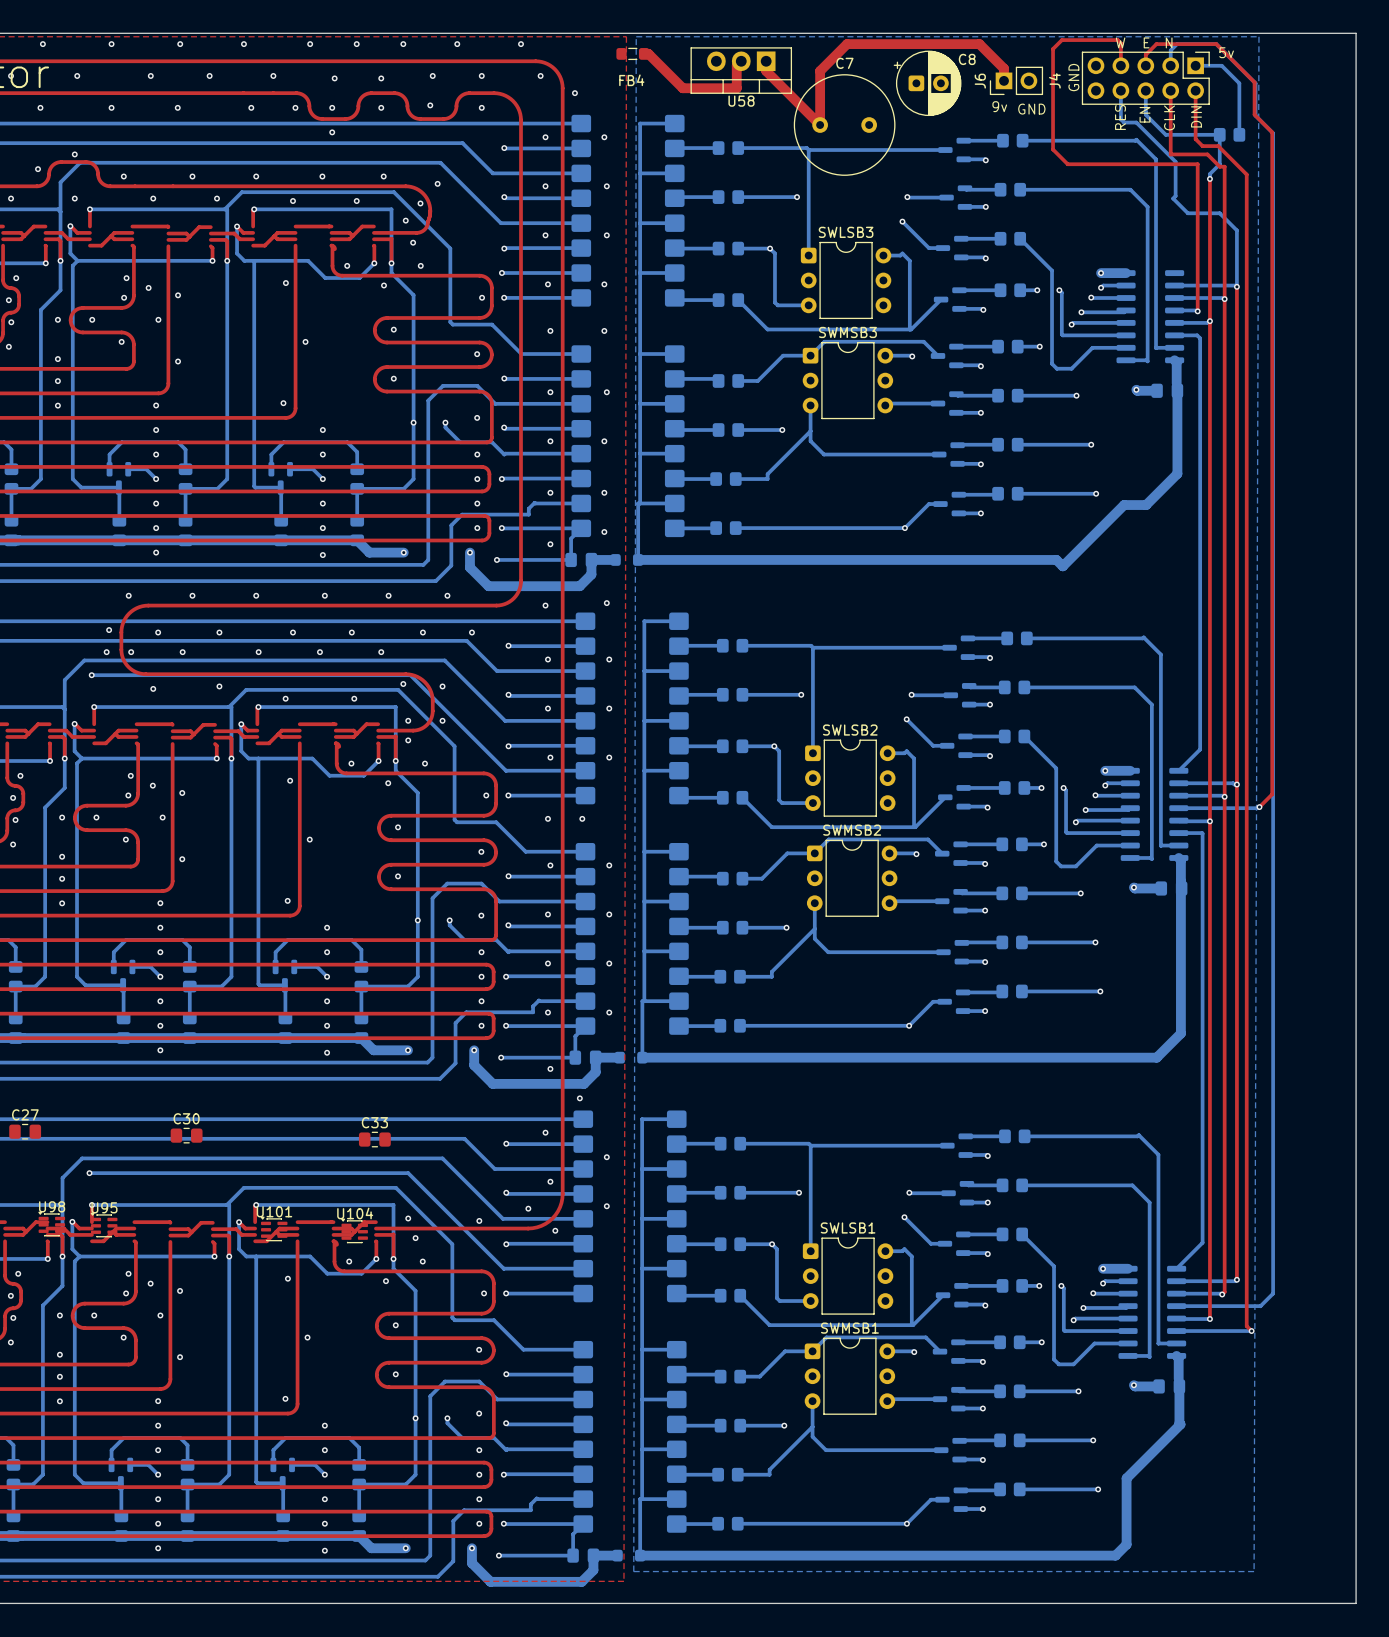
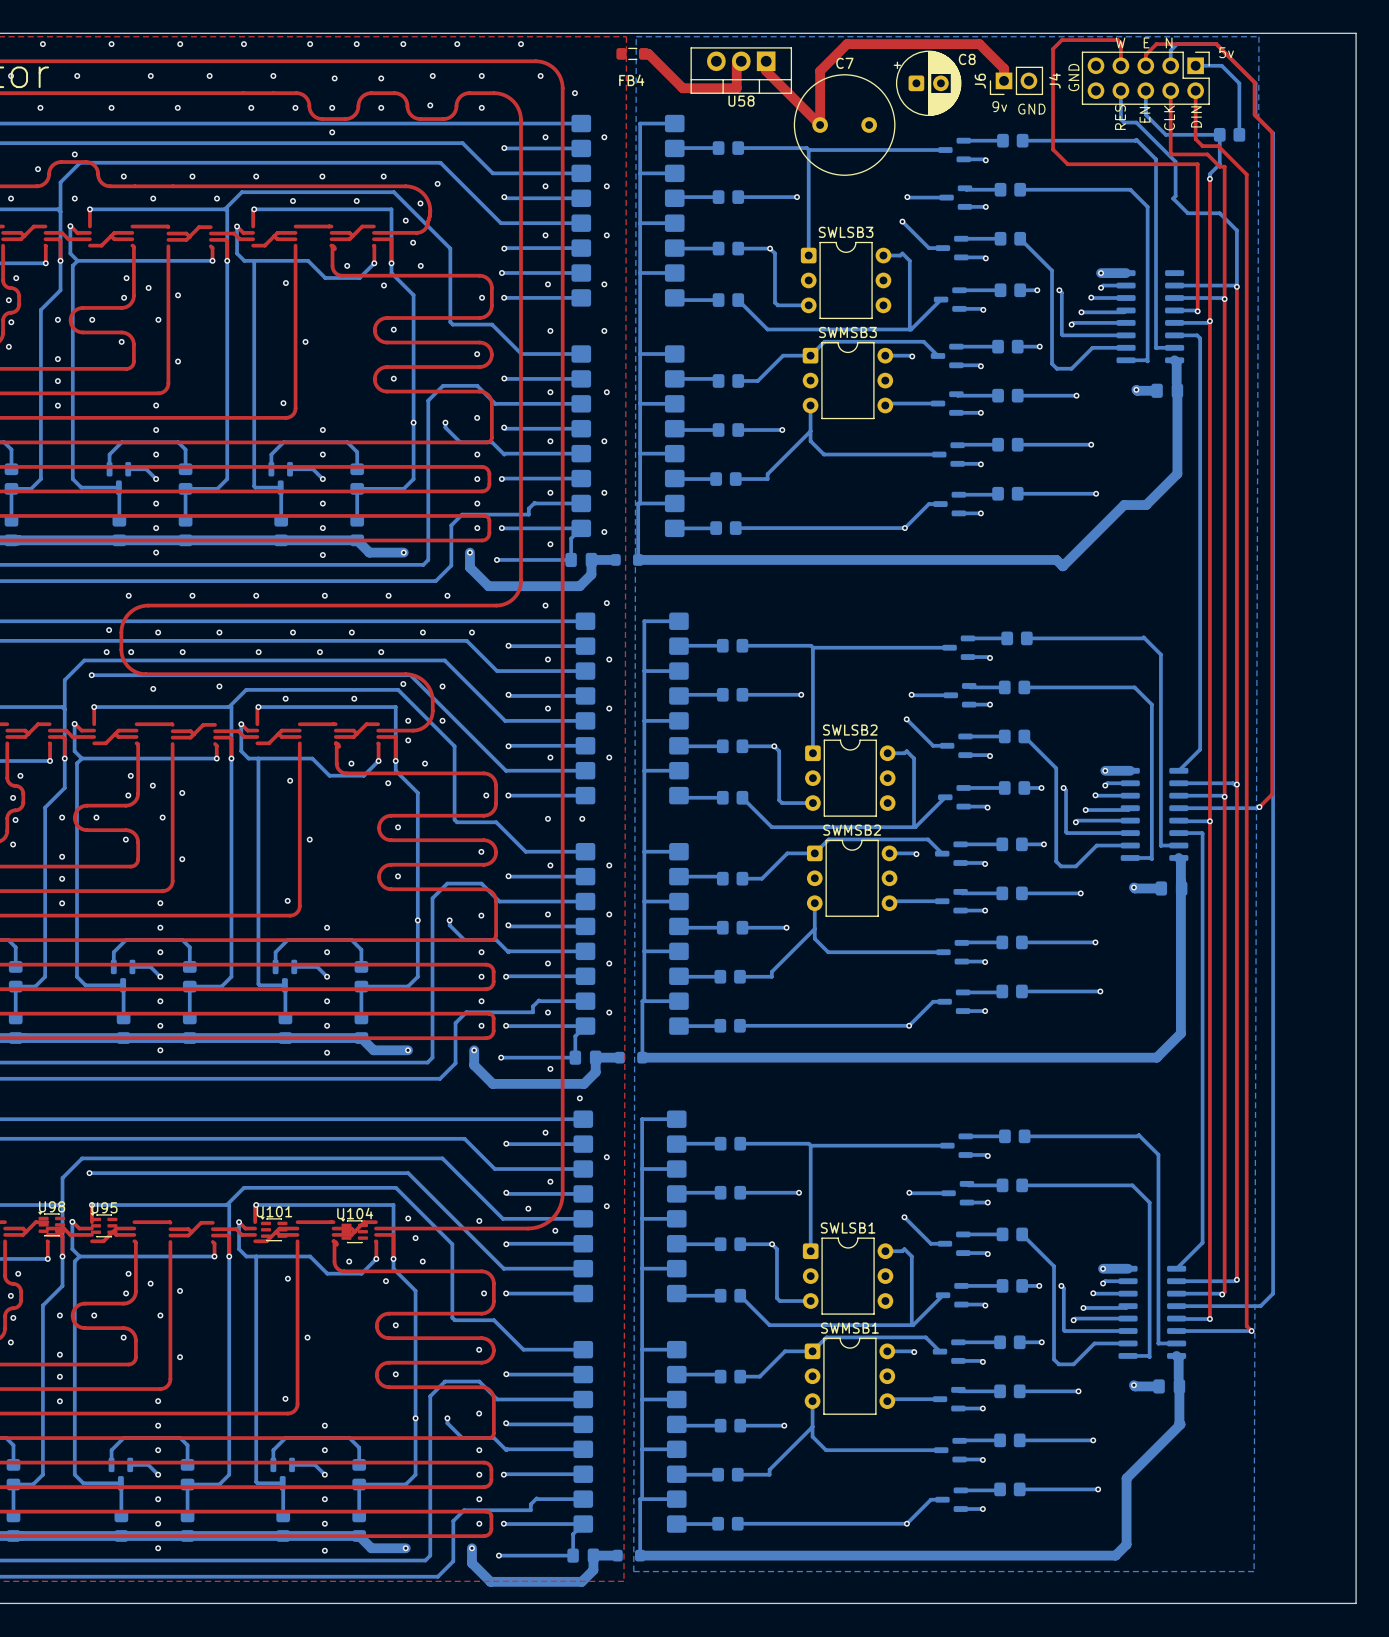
C27: (25, 1131) -> none
C30: (186, 1135) -> none
C33: (374, 1139) -> none

